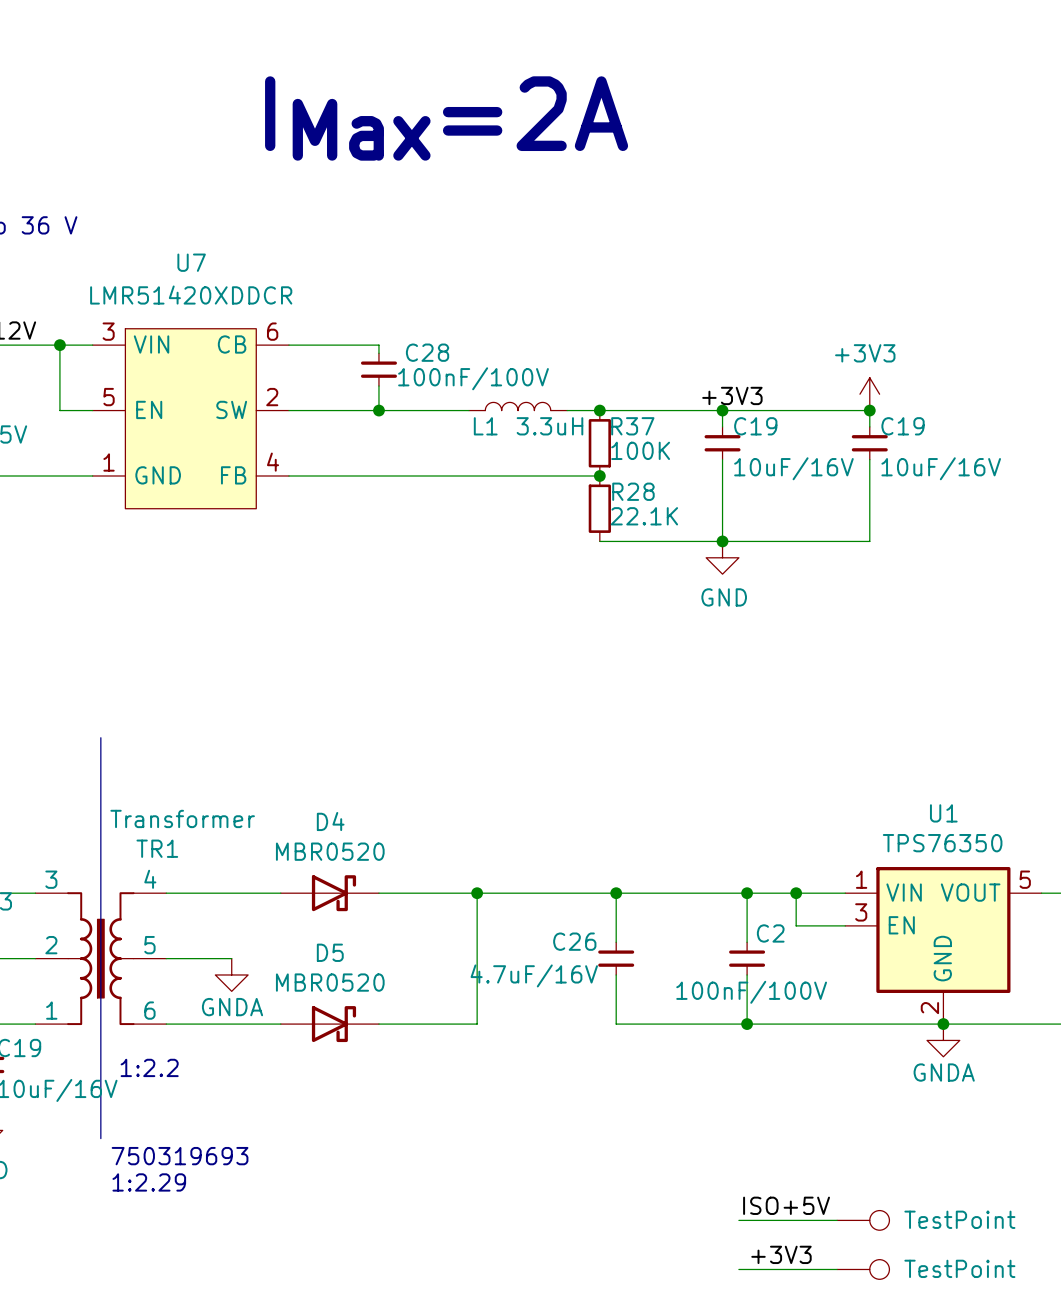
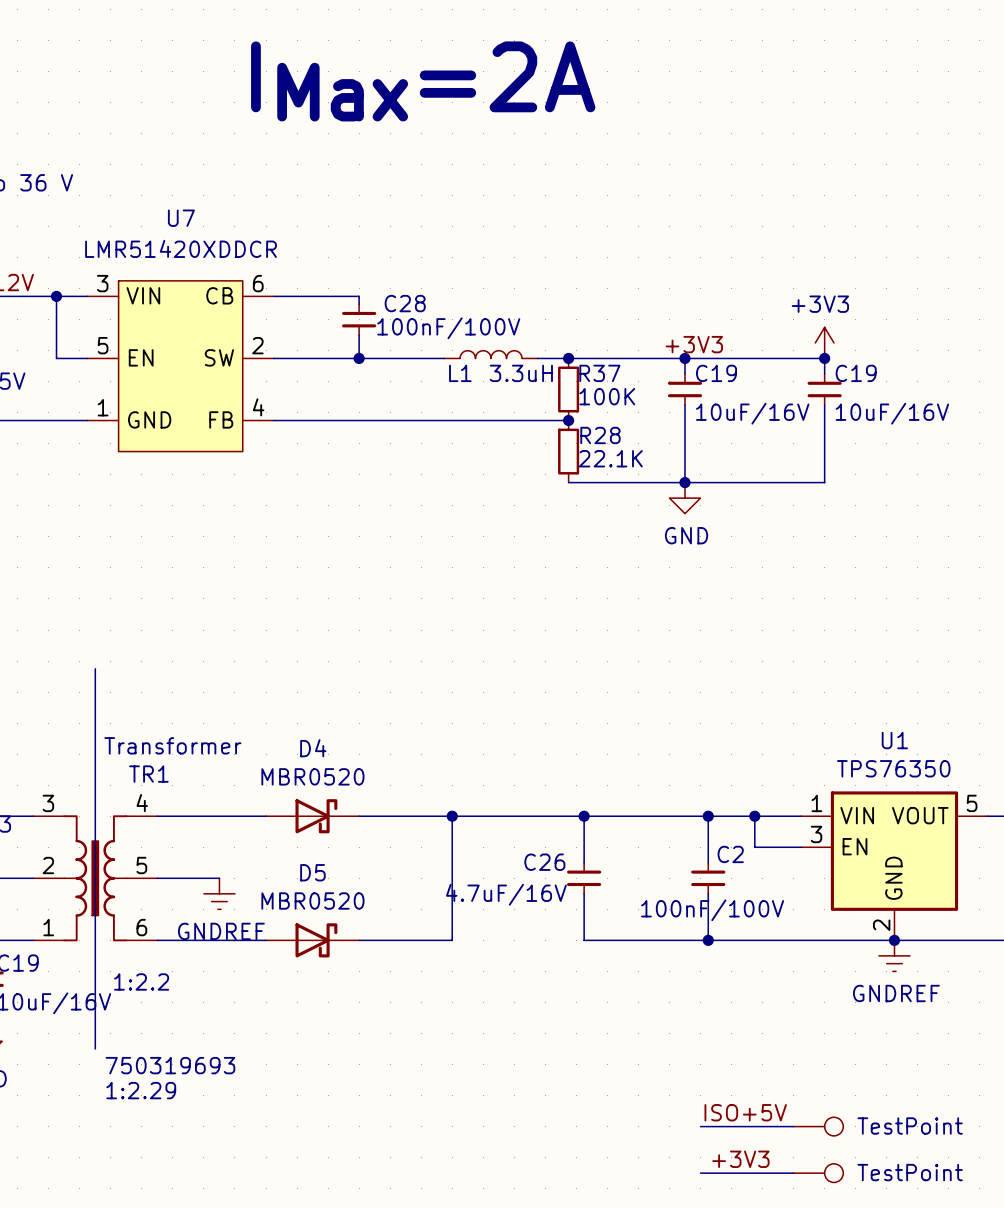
power symbol: GNDA (231, 974) -> GNDREF (219, 893)
power symbol: GNDA (943, 1040) -> GNDREF (894, 955)

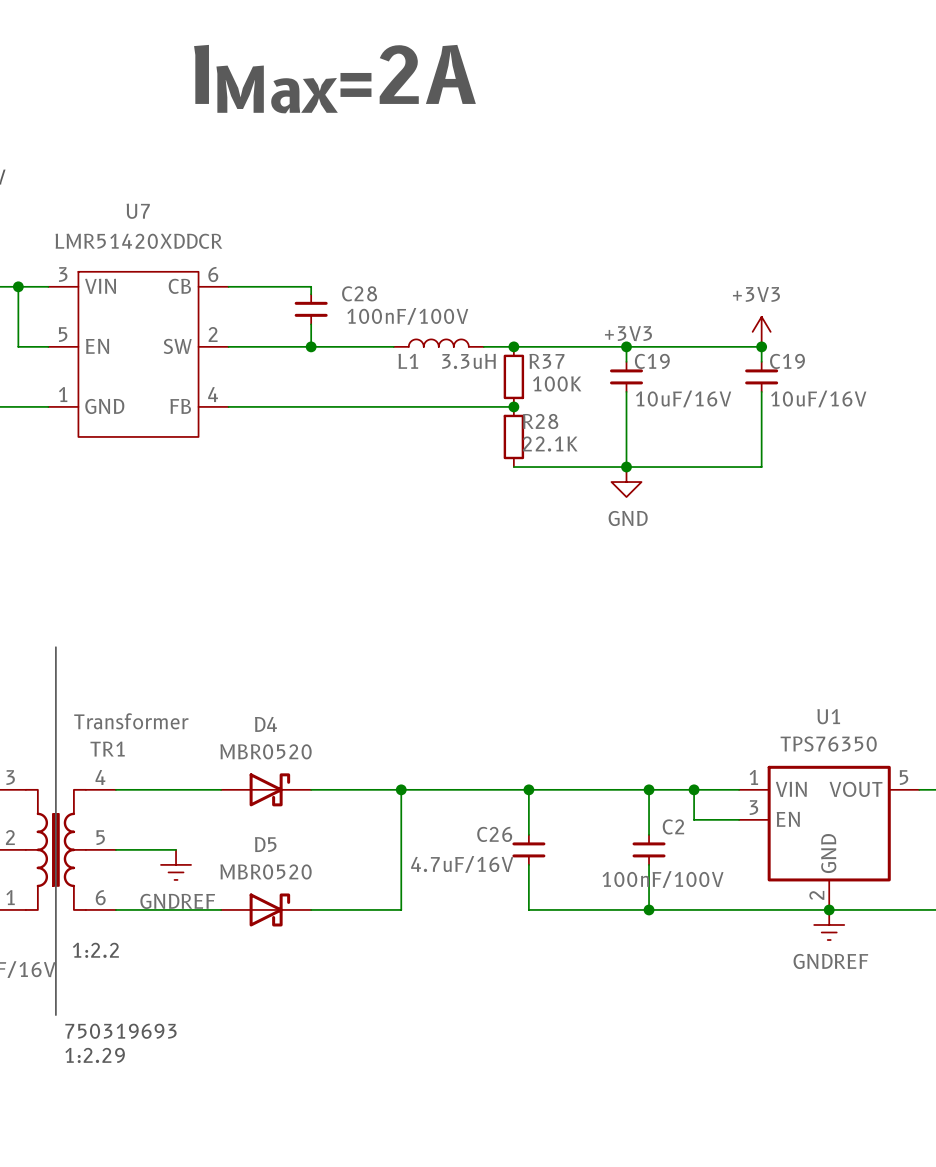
label: ISO+5V (745, 1112) -> none
wire: (700, 1126) (793, 1126) -> none
part: TestPoint (818, 1126) -> none
label: +3V3 (740, 1159) -> none
wire: (700, 1173) (793, 1173) -> none
part: TestPoint (818, 1173) -> none

